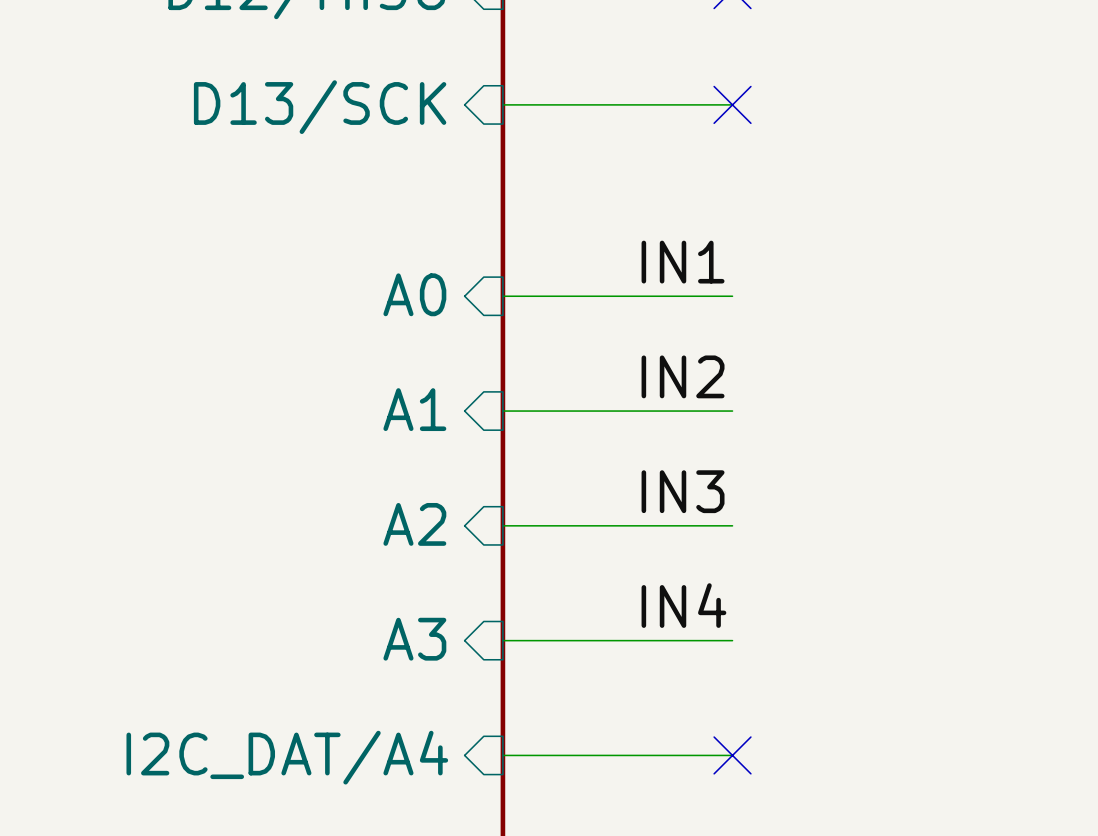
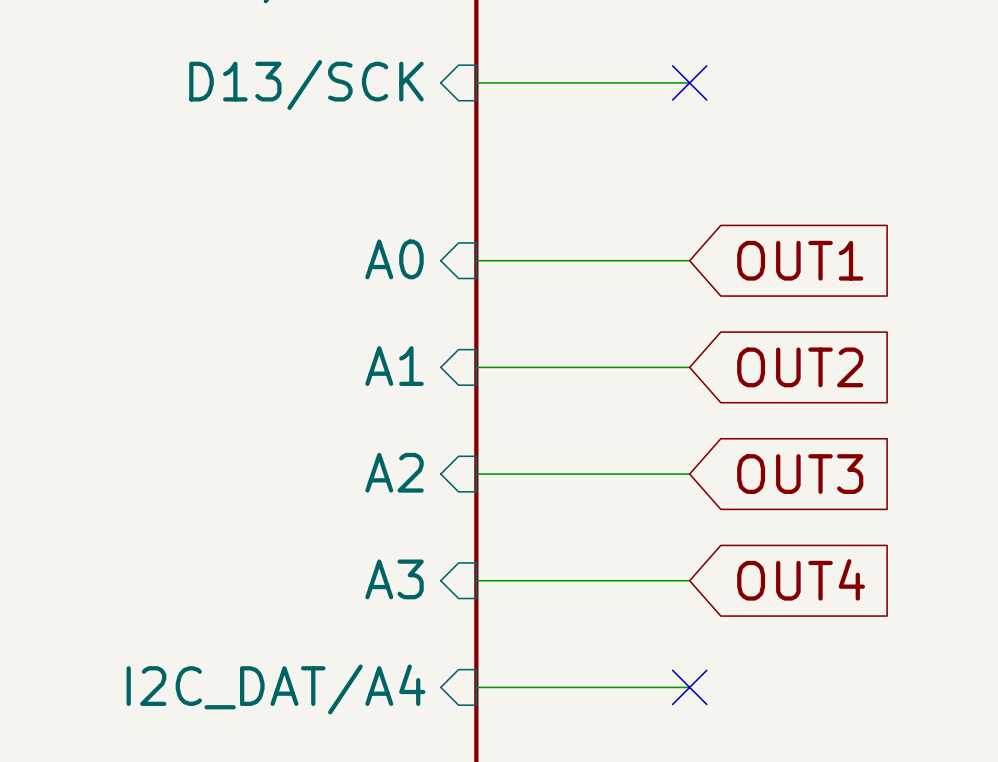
label: IN1 (683, 262) -> none
global label: none -> OUT1 (800, 260)
label: IN2 (683, 376) -> none
global label: none -> OUT2 (800, 367)
label: IN3 (683, 491) -> none
global label: none -> OUT3 (800, 474)
label: IN4 (683, 605) -> none
global label: none -> OUT4 (801, 579)

